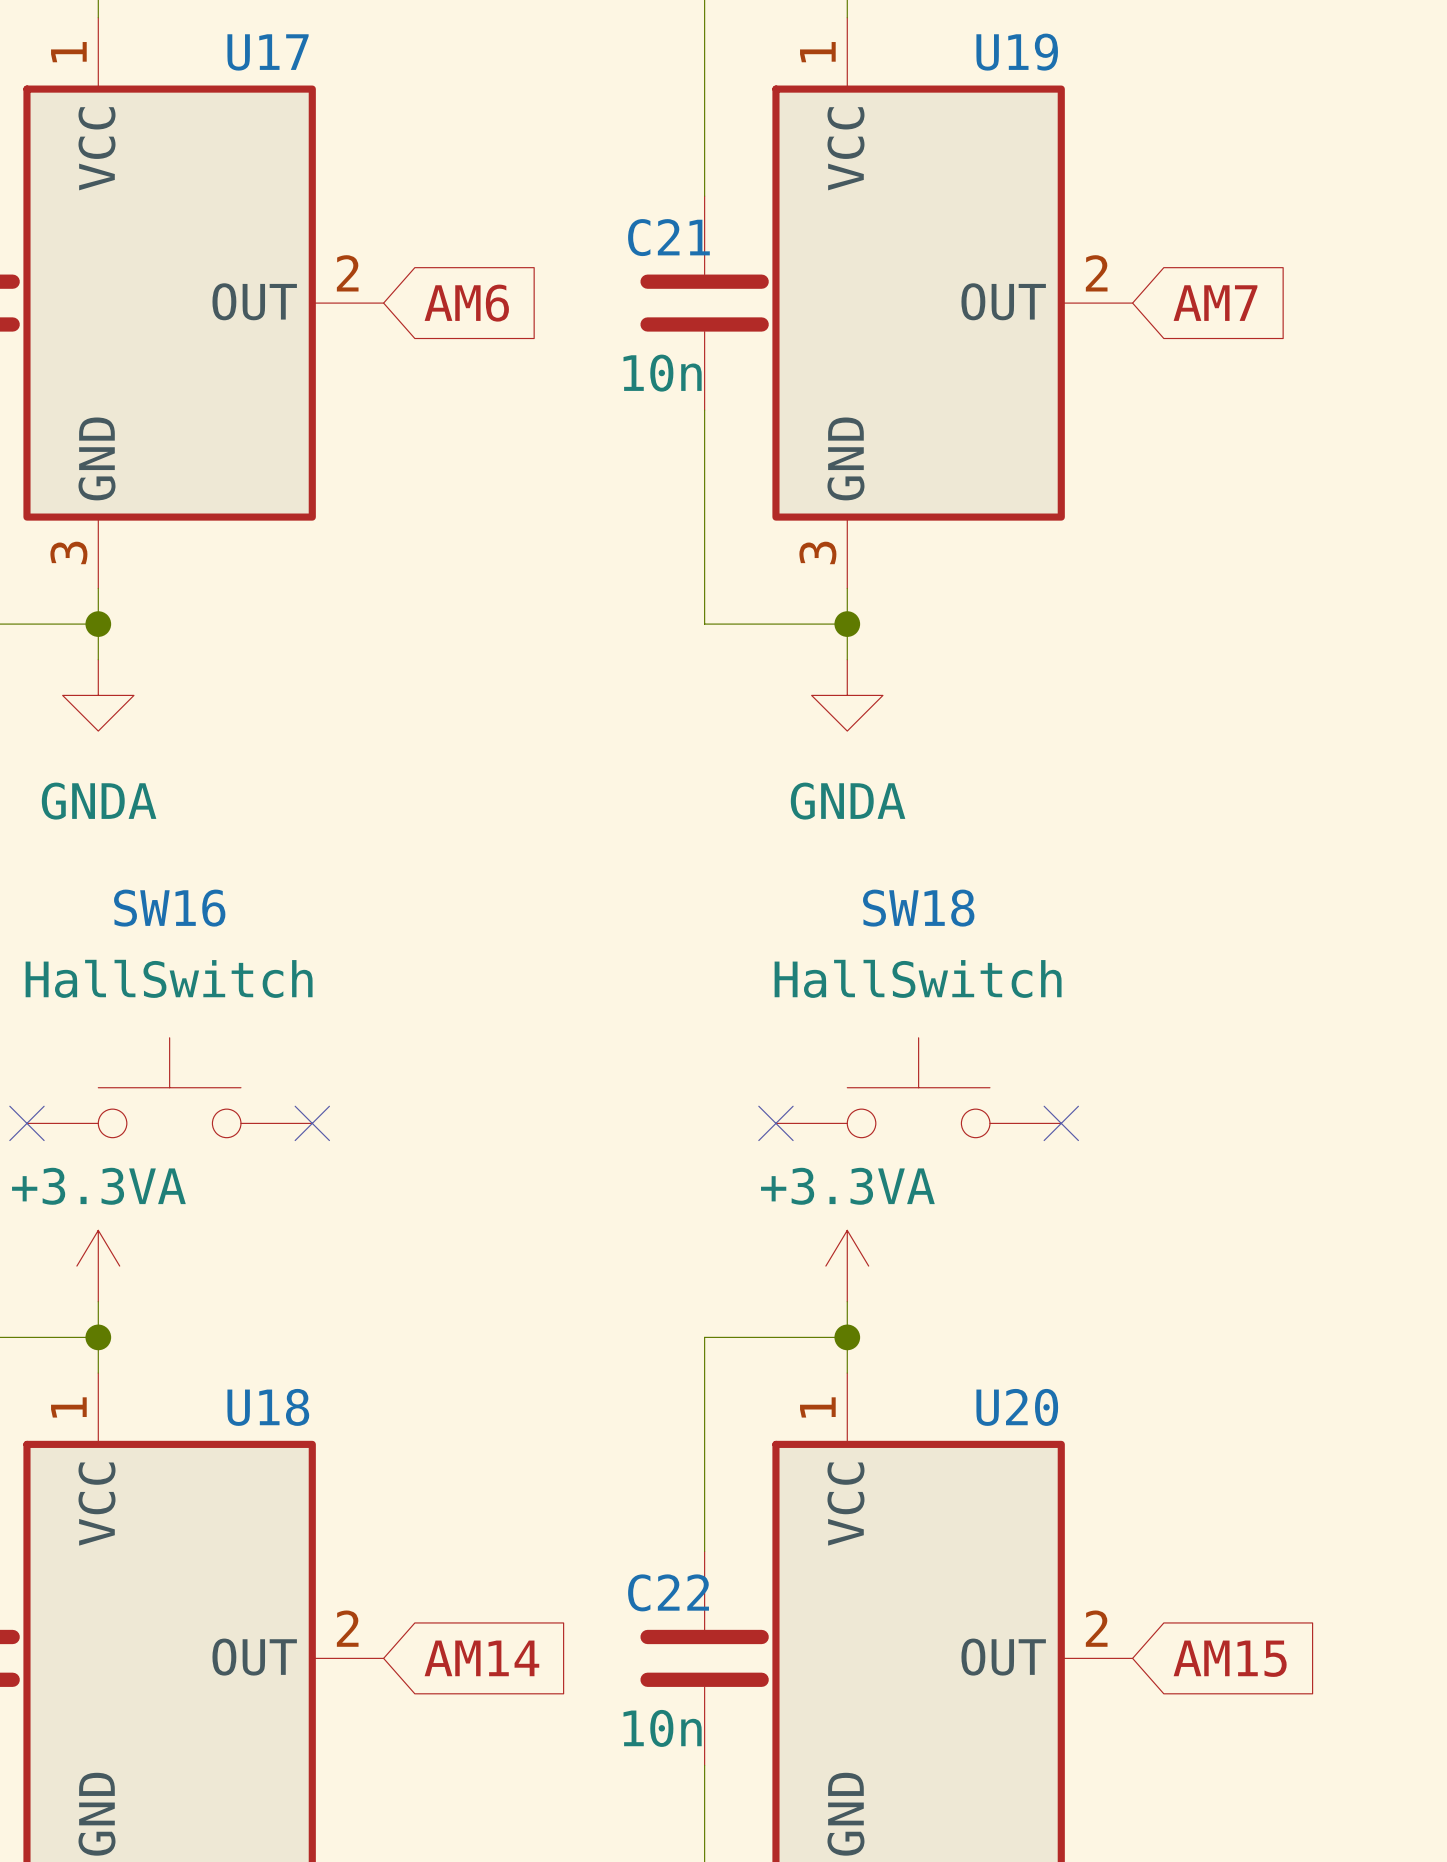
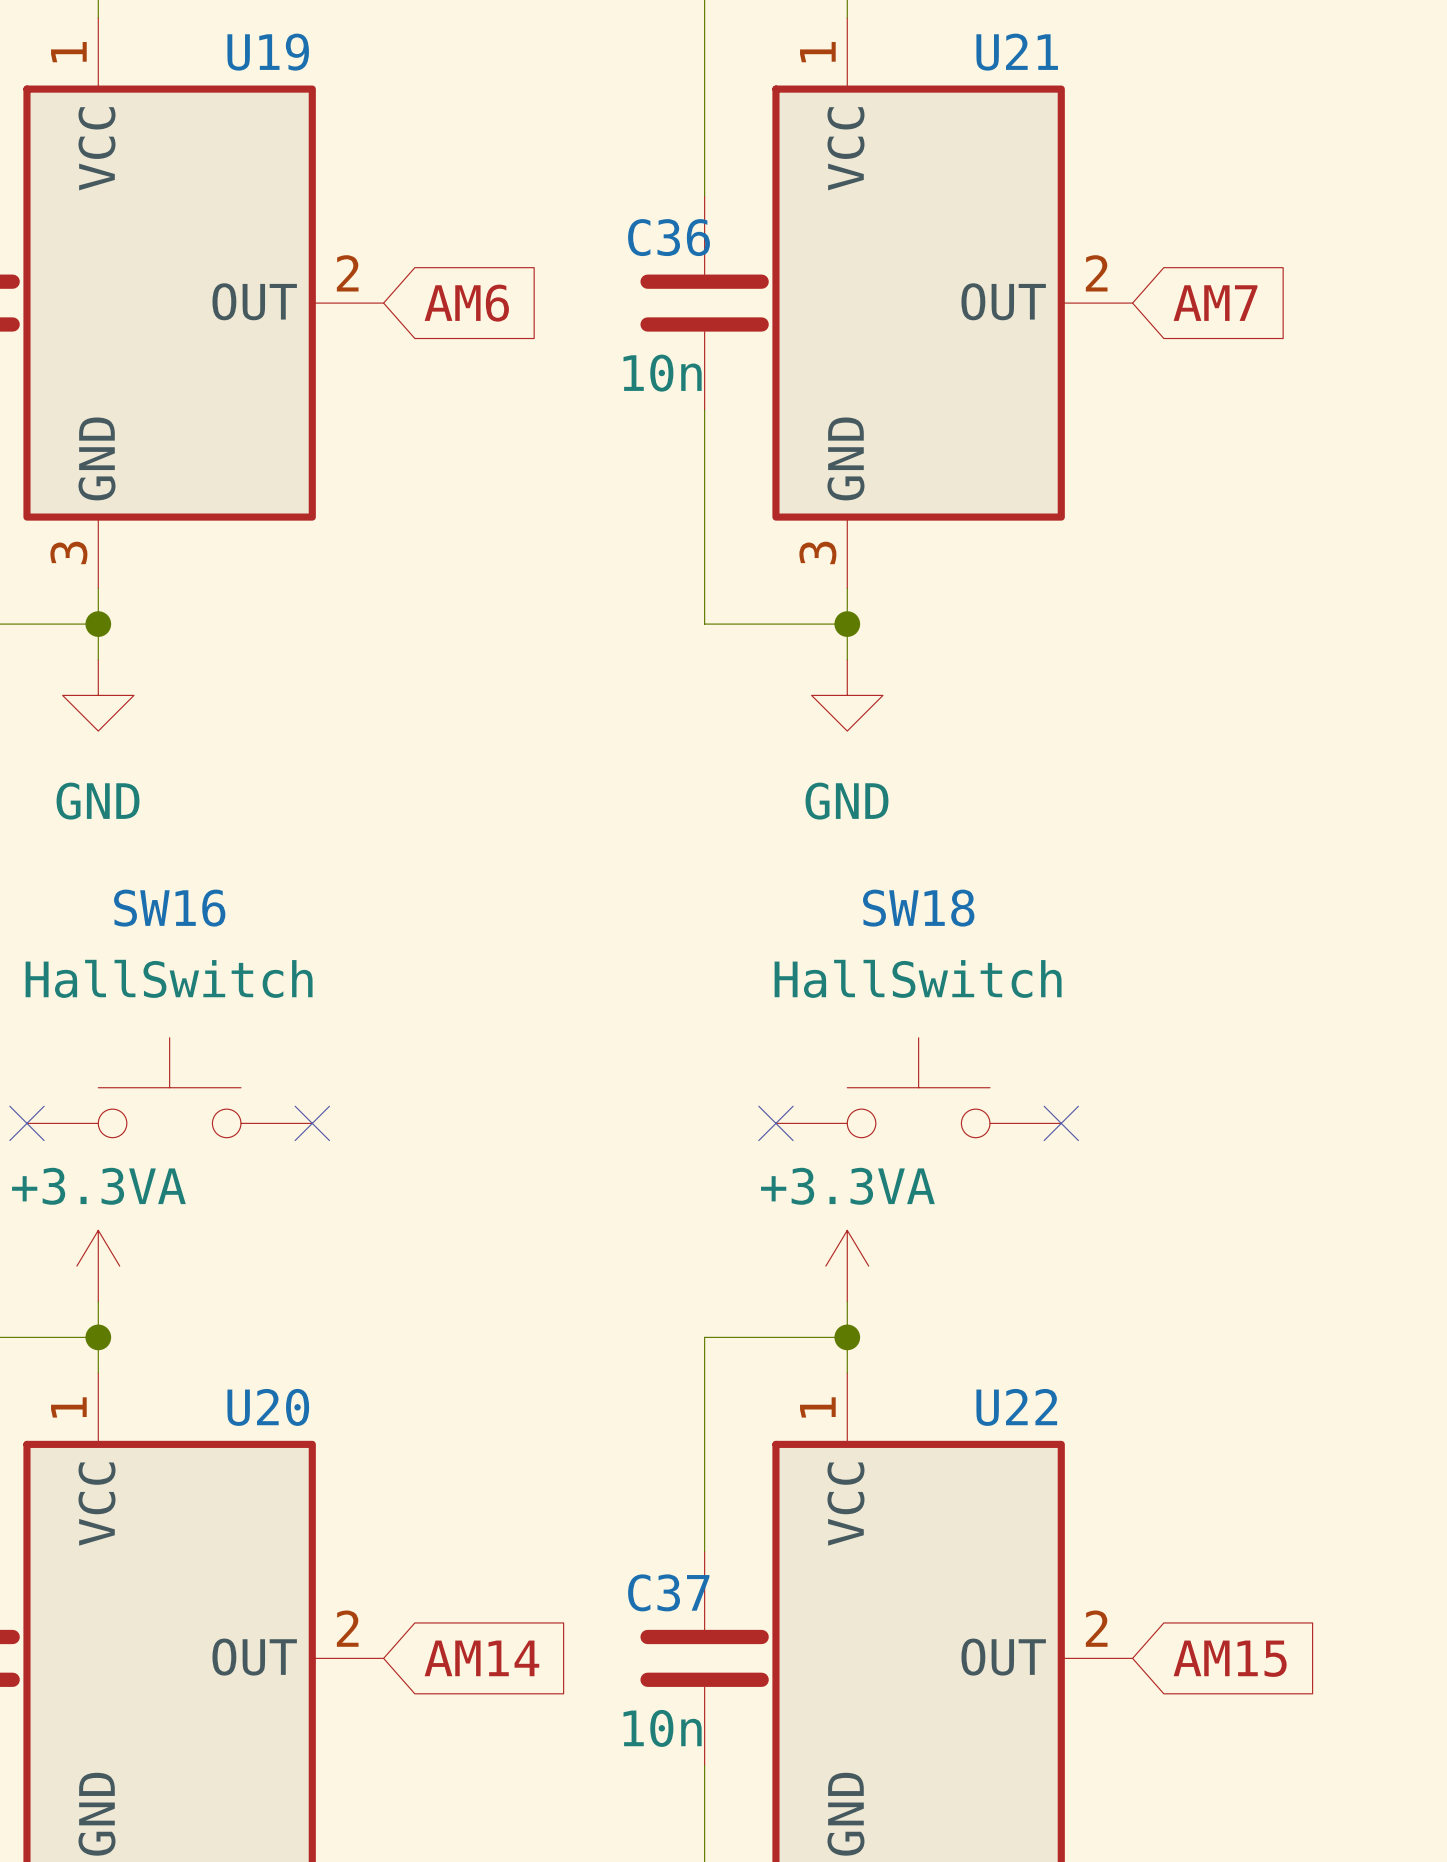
U17 name: U17 (268, 52) -> U19 (268, 52)
U19 name: U19 (1017, 52) -> U21 (1017, 52)
C21 name: C21 (668, 237) -> C36 (669, 237)
power symbol: GNDA (98, 695) -> GND (98, 695)
power symbol: GNDA (847, 695) -> GND (847, 695)
U18 name: U18 (268, 1407) -> U20 (268, 1407)
U20 name: U20 (1017, 1407) -> U22 (1016, 1407)
C22 name: C22 (668, 1592) -> C37 (668, 1592)

